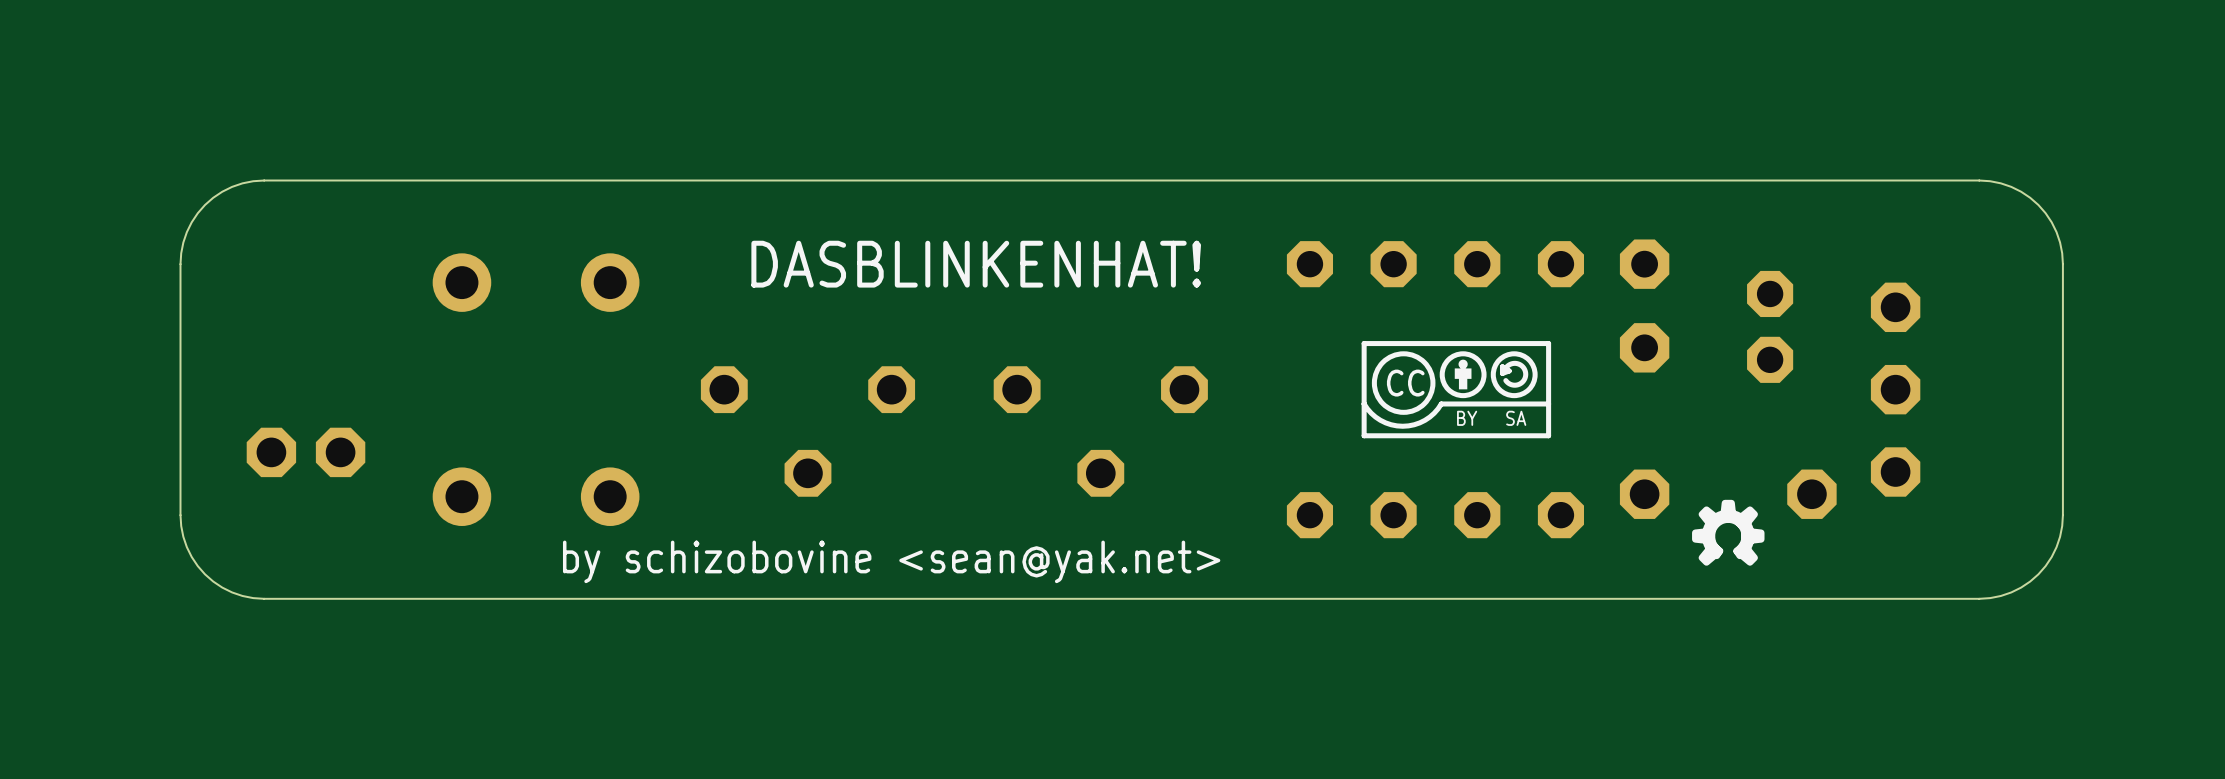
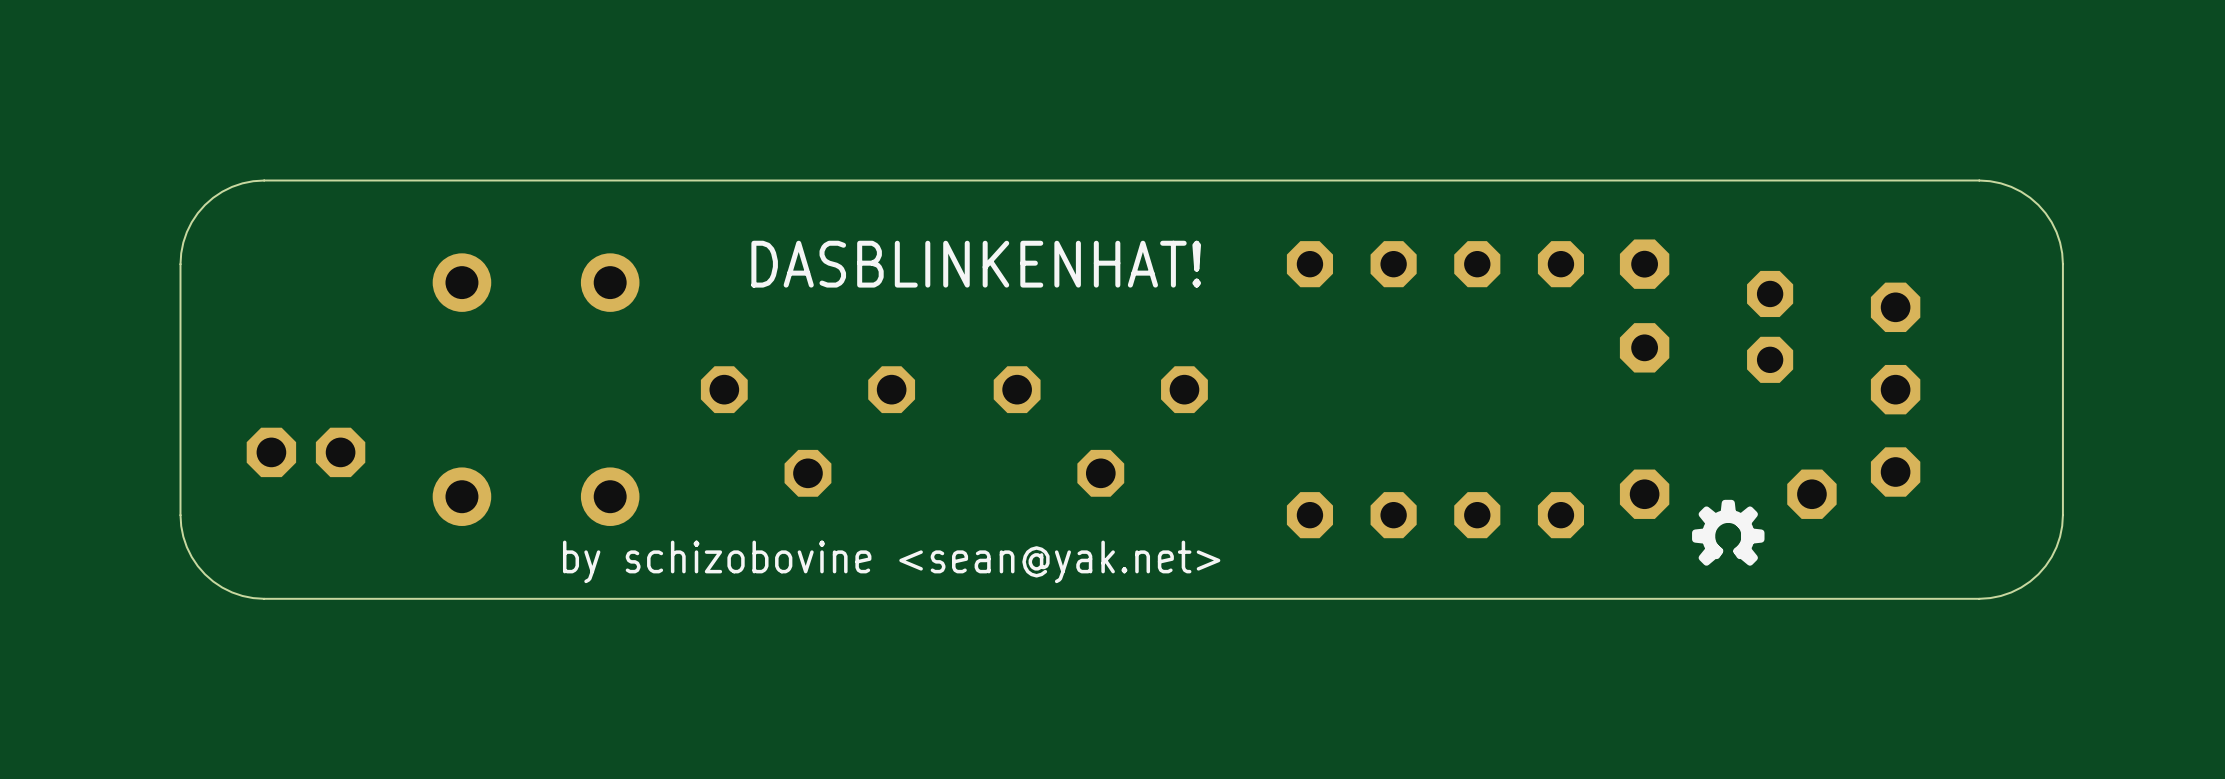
drawing: [1361, 341, 1552, 439] -> none

